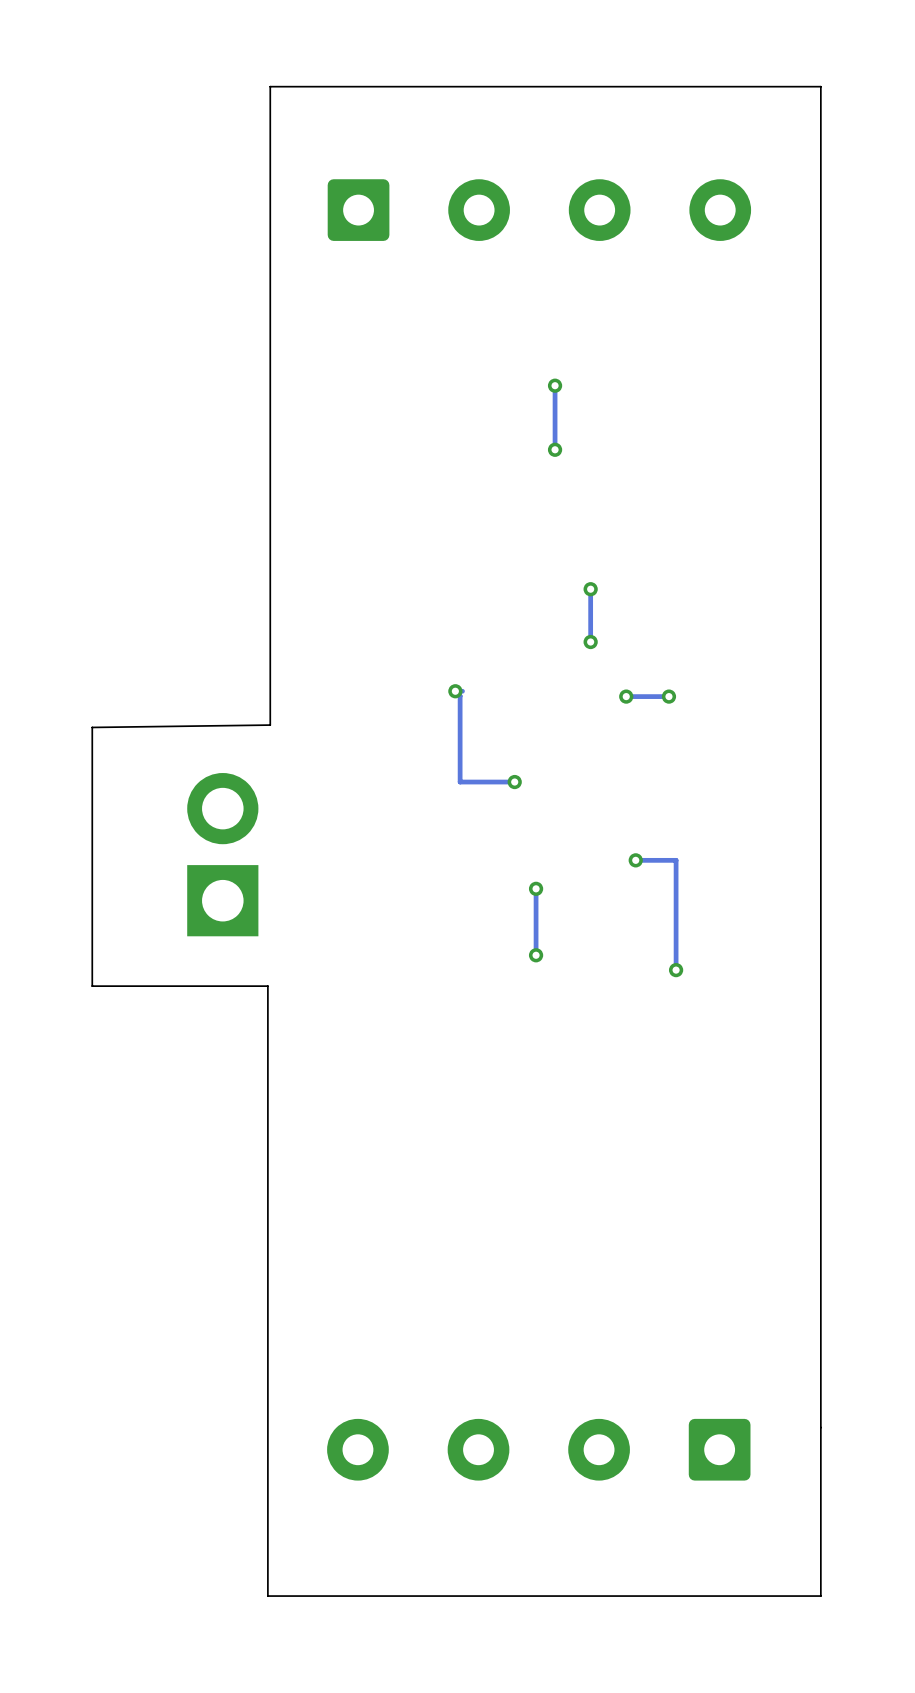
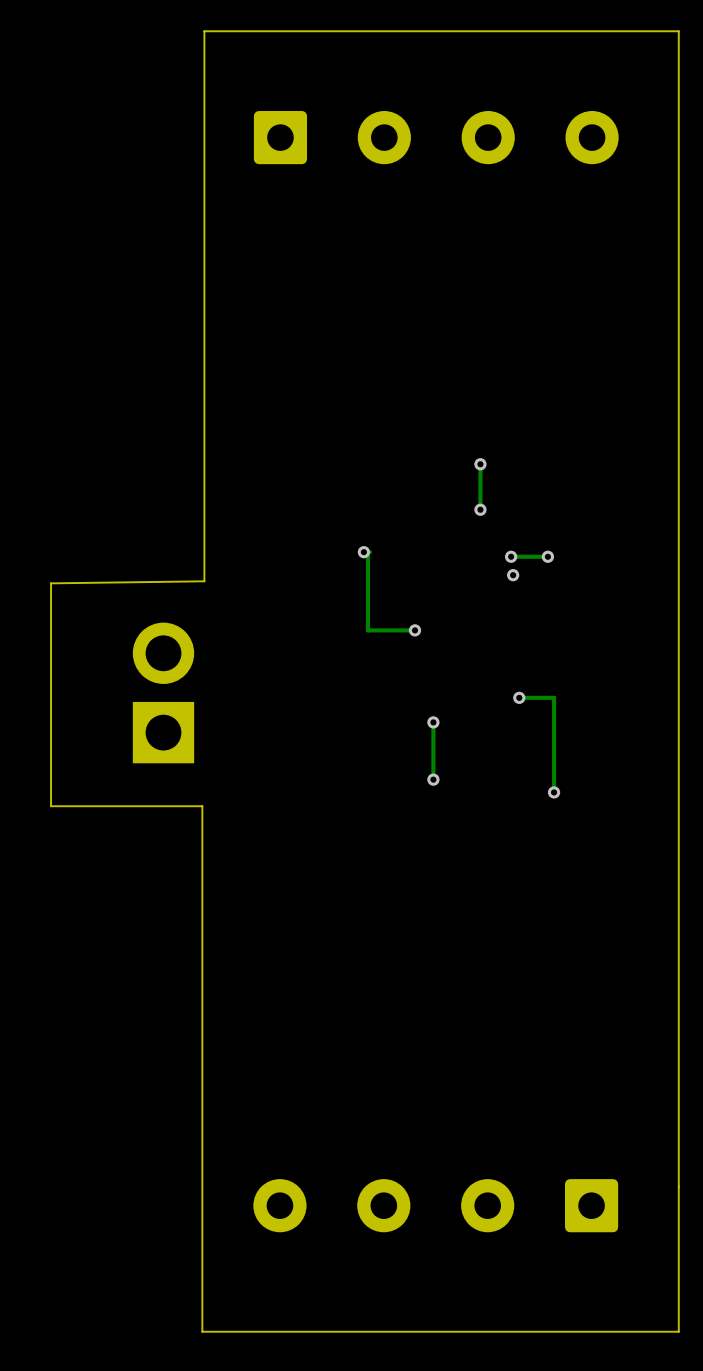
track: (555, 385) (555, 449) -> none
via: (555, 385) -> none
via: (555, 449) -> none
via: none -> (513, 575)

